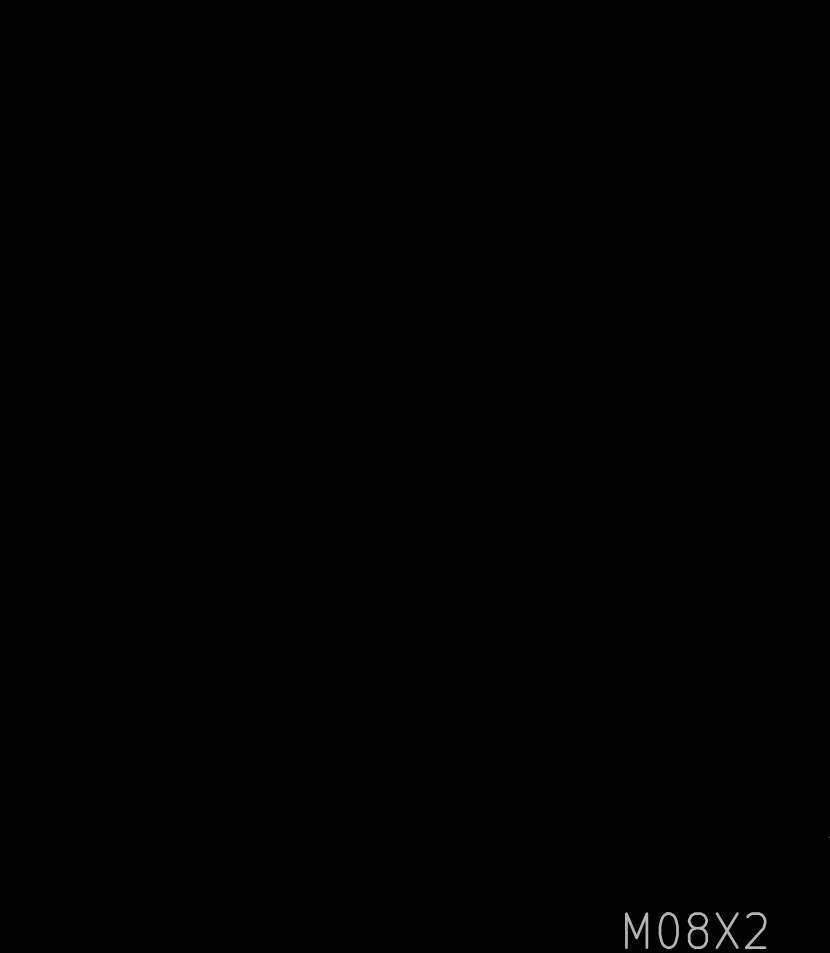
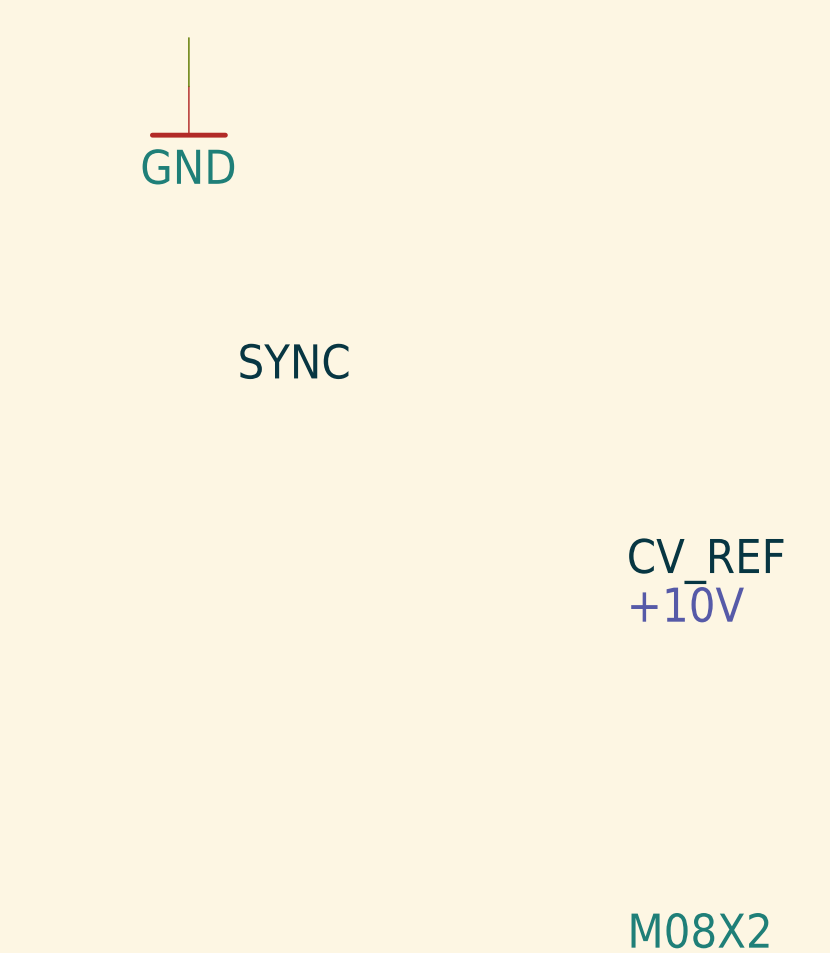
wire: none -> (188, 37) (188, 86)
power symbol: none -> GND (188, 112)
label: none -> SYNC (294, 361)
label: none -> CV_REF (706, 561)
text: none -> +10V (687, 604)

